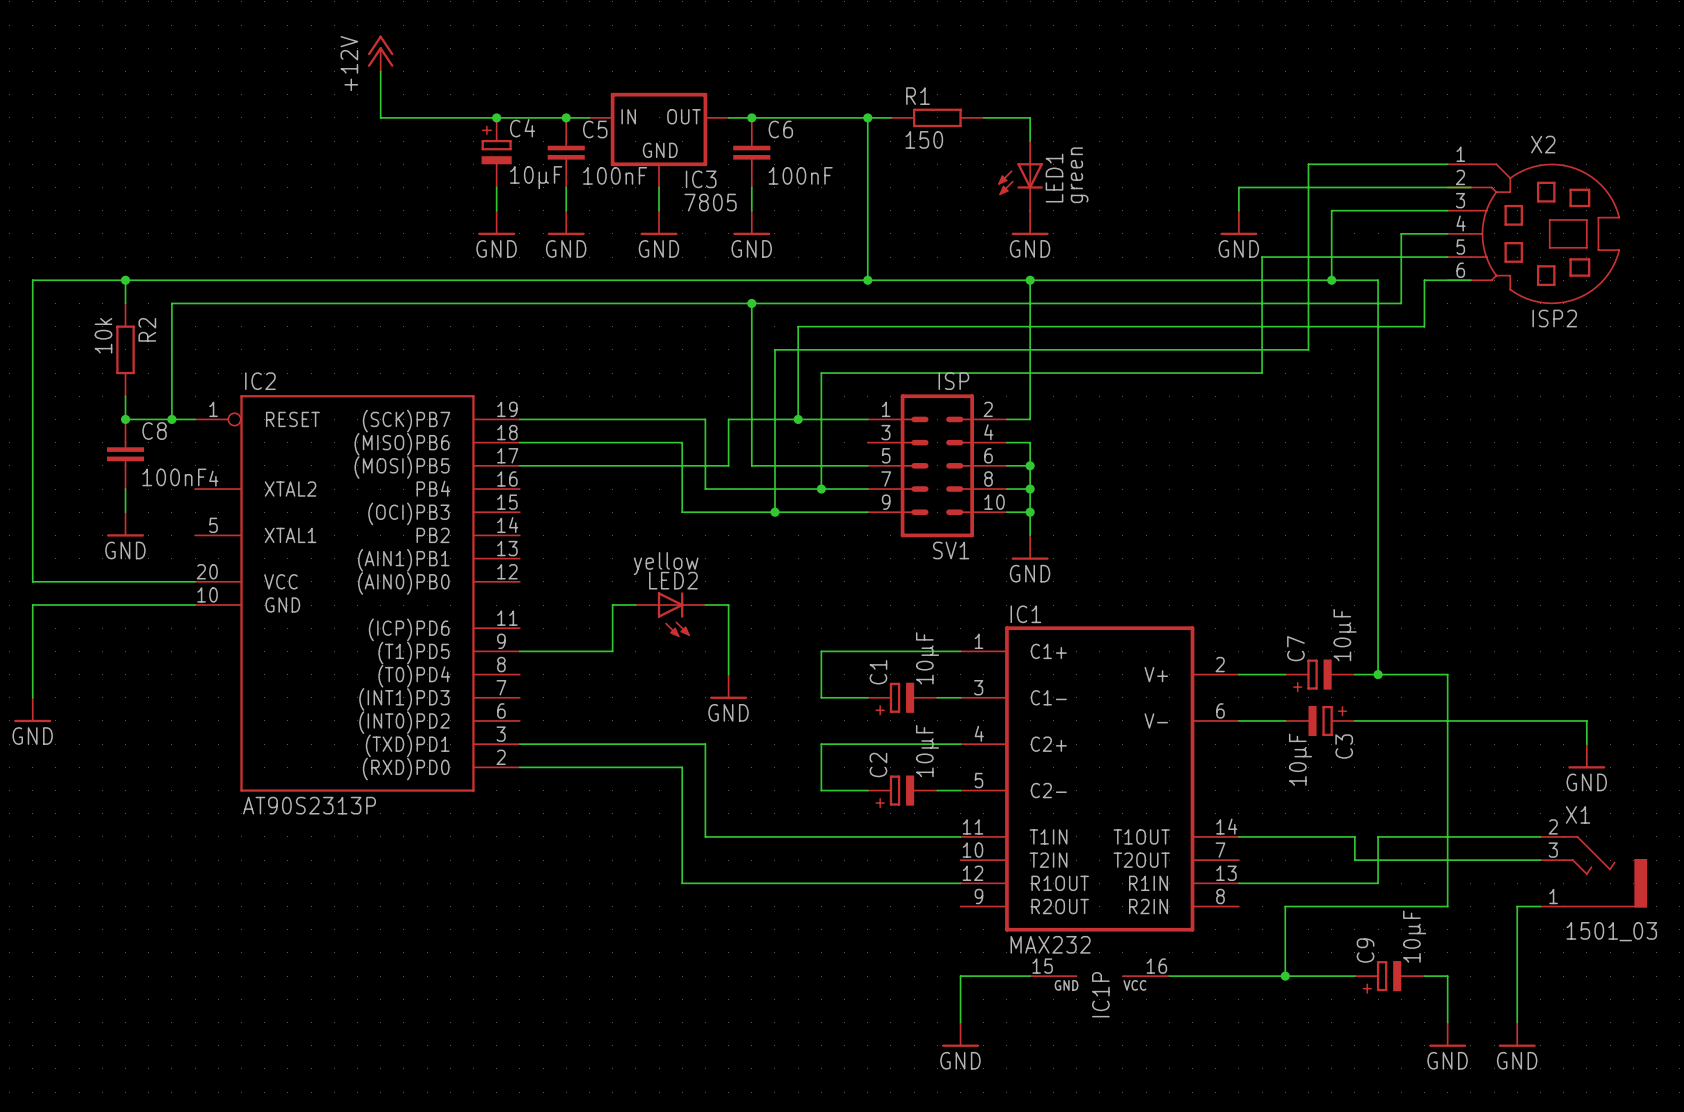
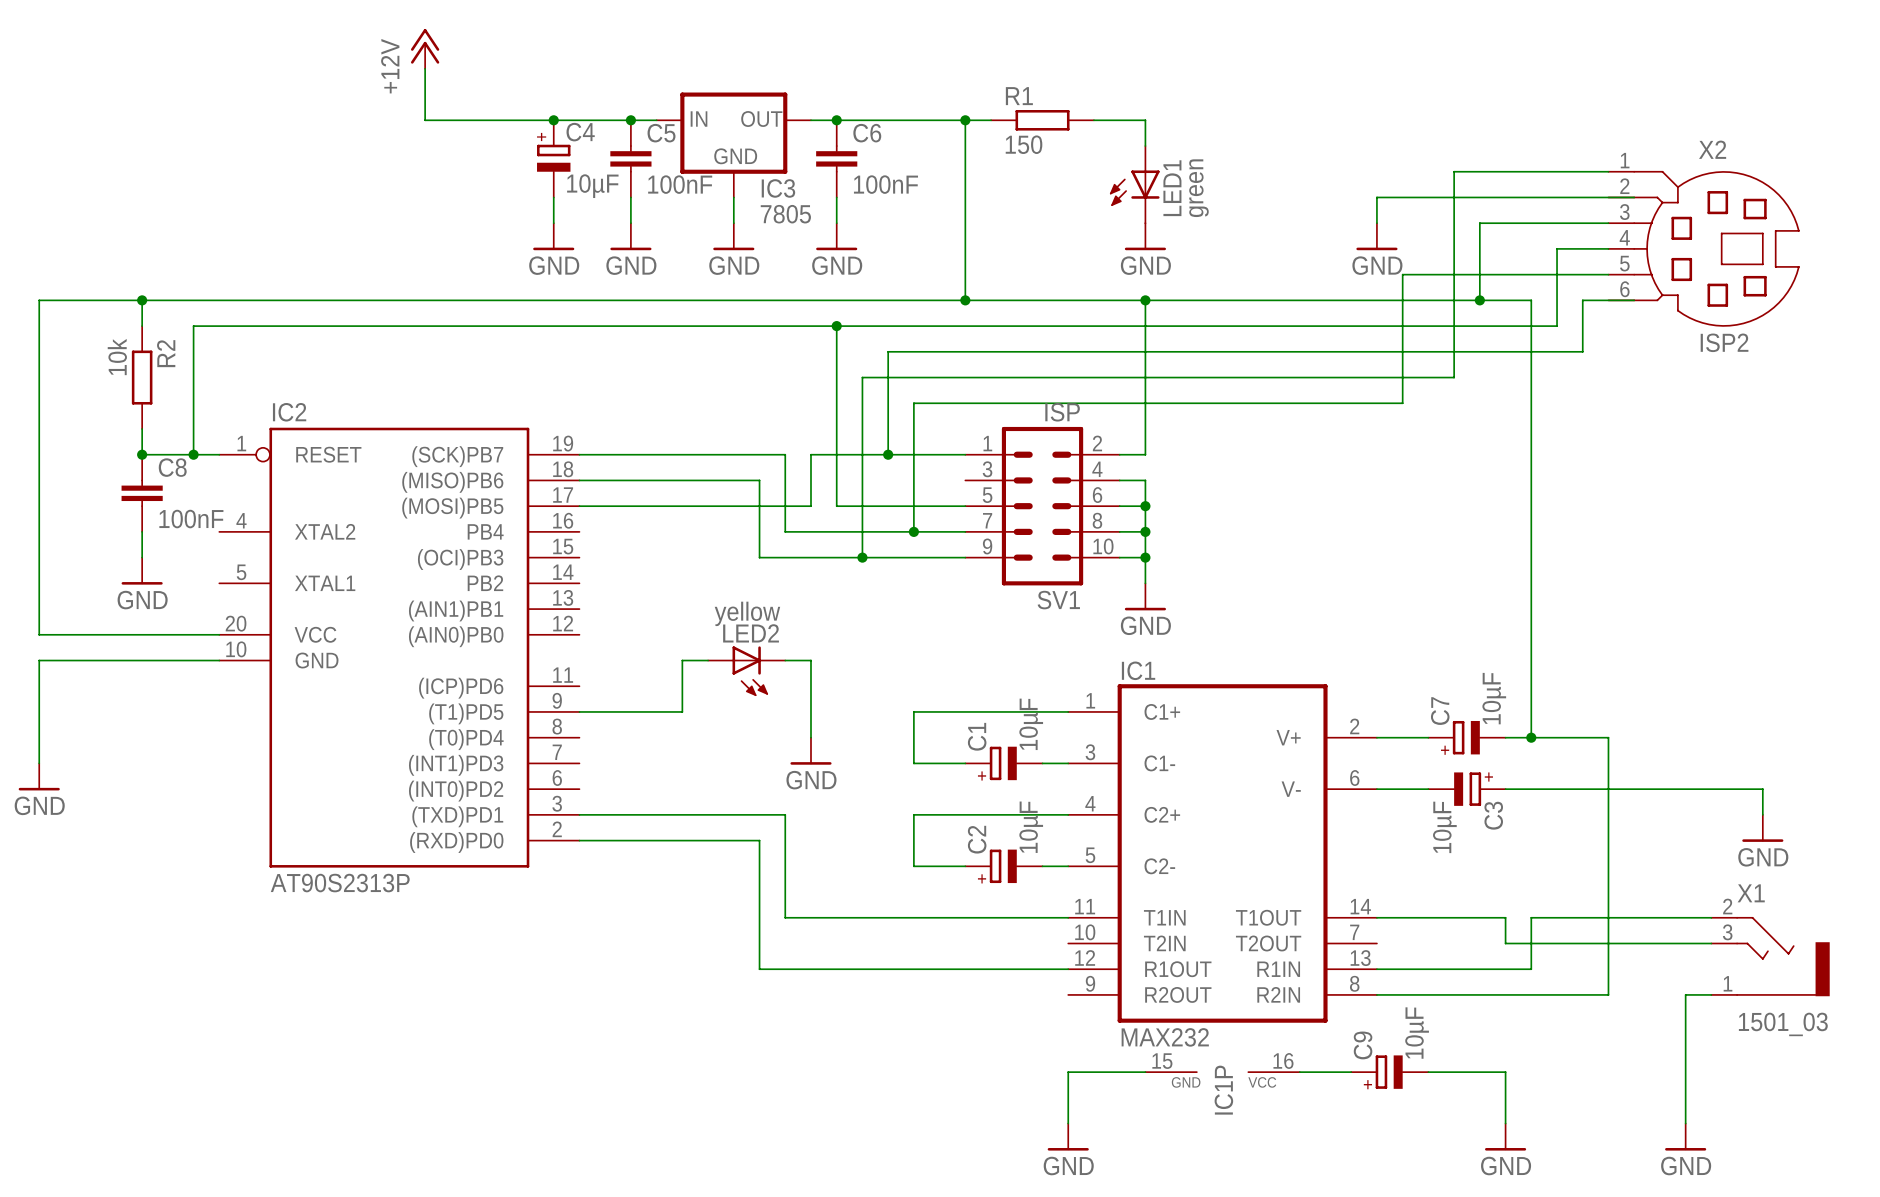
wire: (1285, 906) (1285, 976) (1215, 976) -> (1428, 994) (1376, 994)
junction: (1285, 976) -> none
wire: none -> (1505, 1072) (1505, 1123)
C9 position: (1389, 976) -> (1389, 1072)
wire: (1424, 976) (1447, 976) (1447, 1022) -> none
power symbol position: GND (1447, 1034) -> GND (1505, 1137)

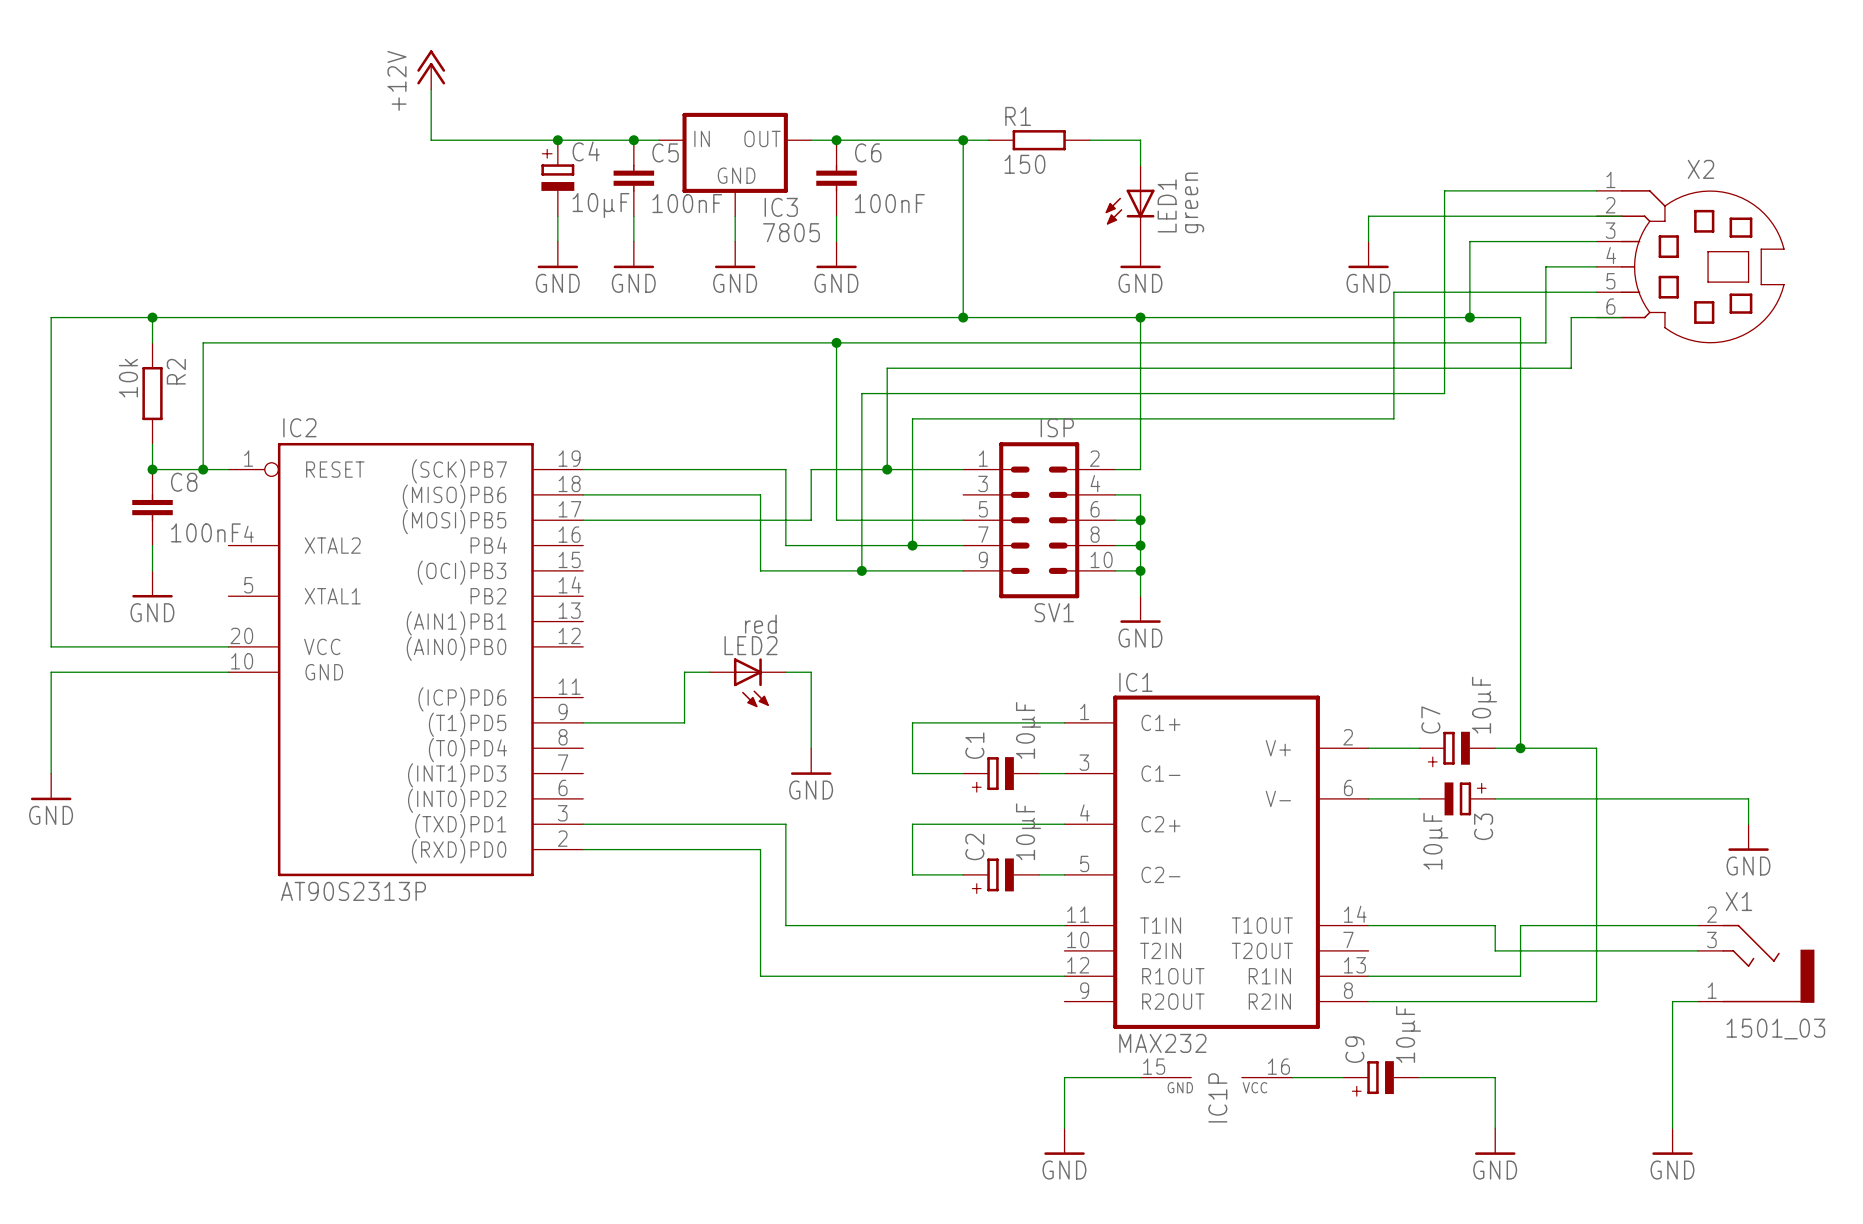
X2 value: ISP2 (1724, 342) -> none
LED2 value: yellow (747, 613) -> red (760, 624)

